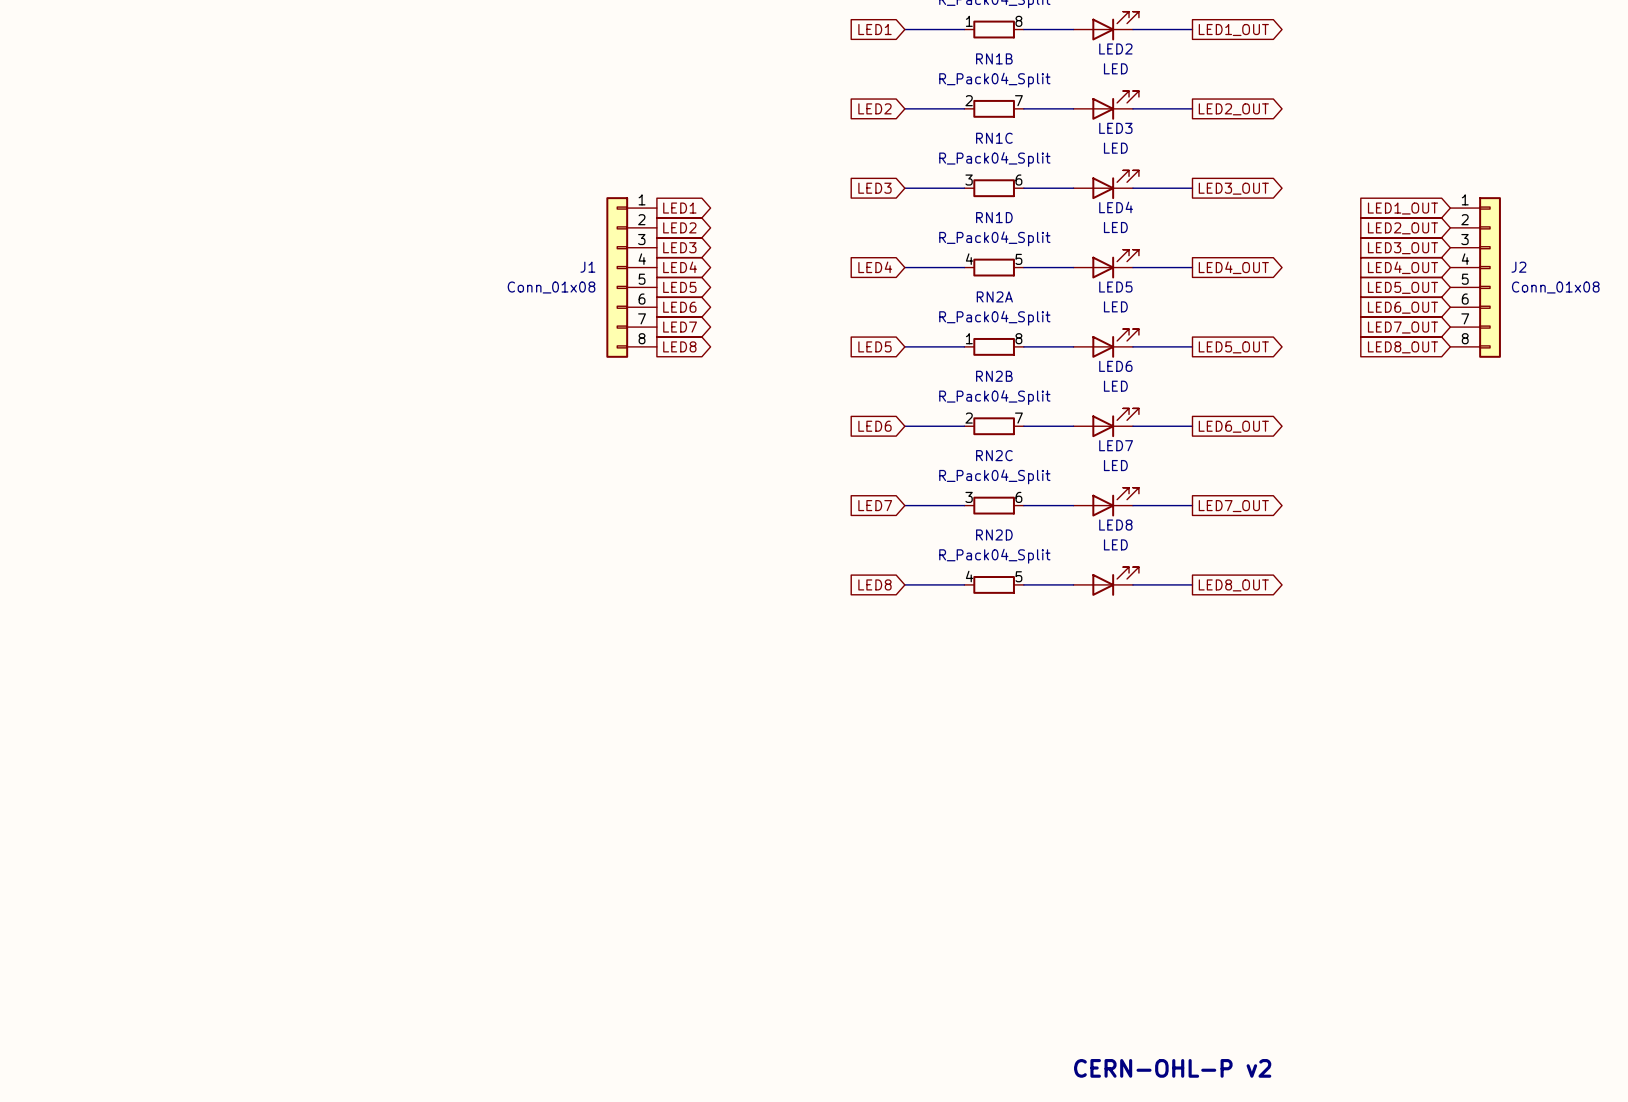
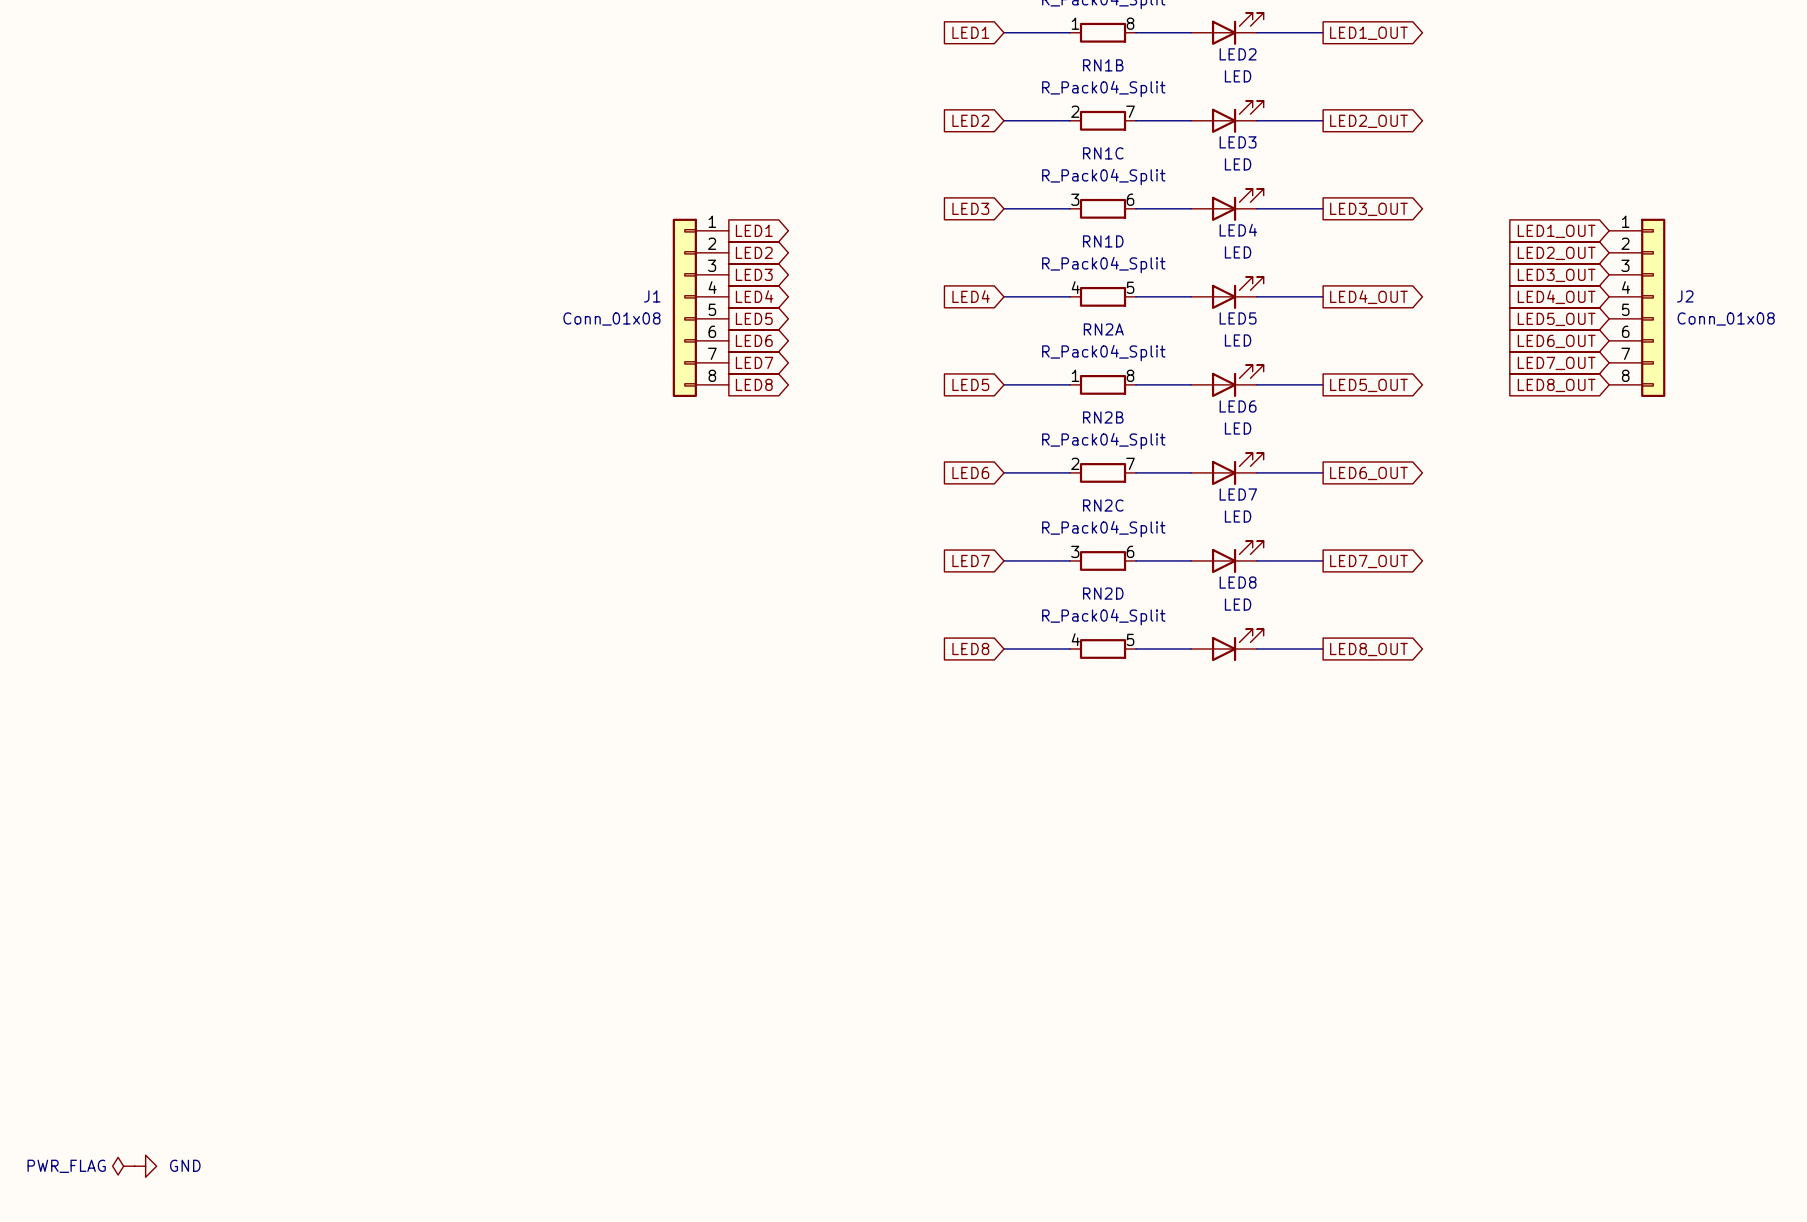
power symbol: none -> PWR_FLAG (123, 1166)
power symbol: none -> GND (145, 1166)
text: CERN-OHL-P v2 (1172, 1068) -> none

